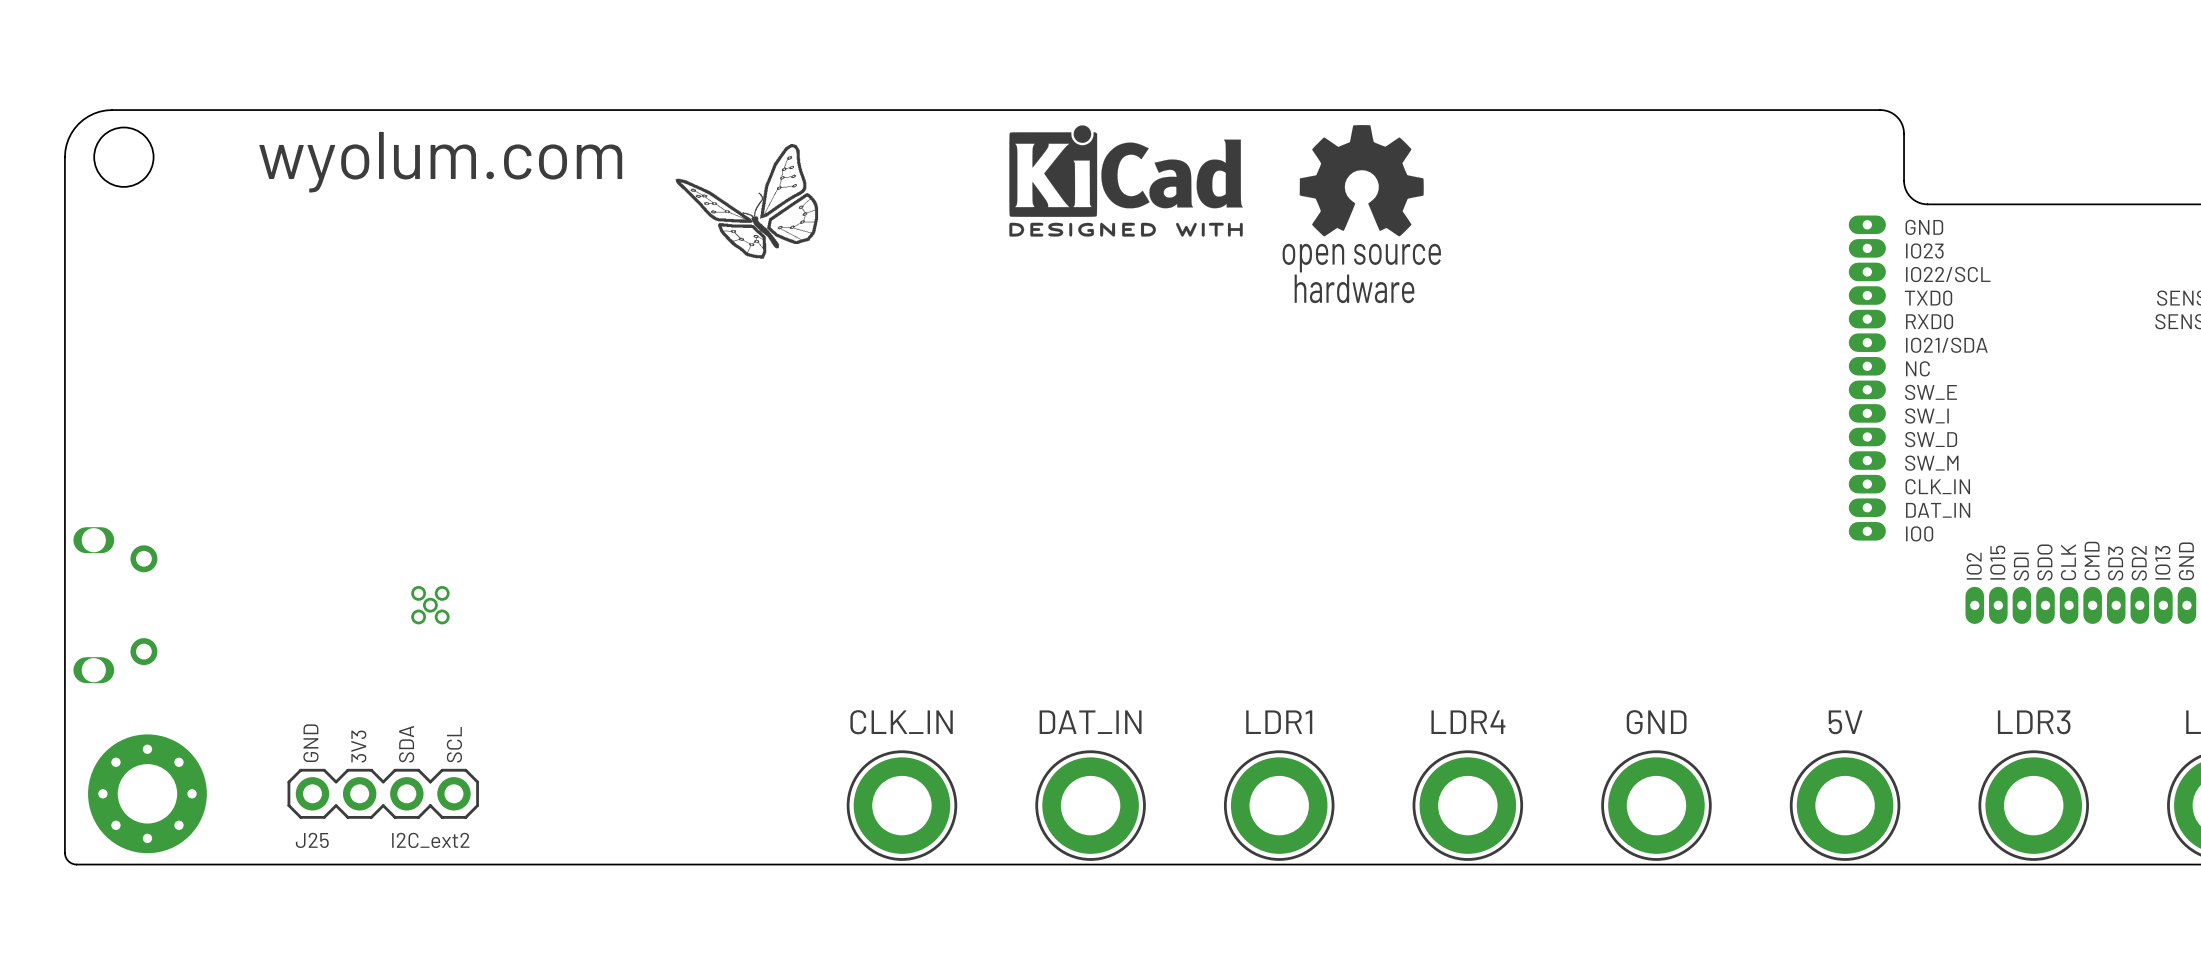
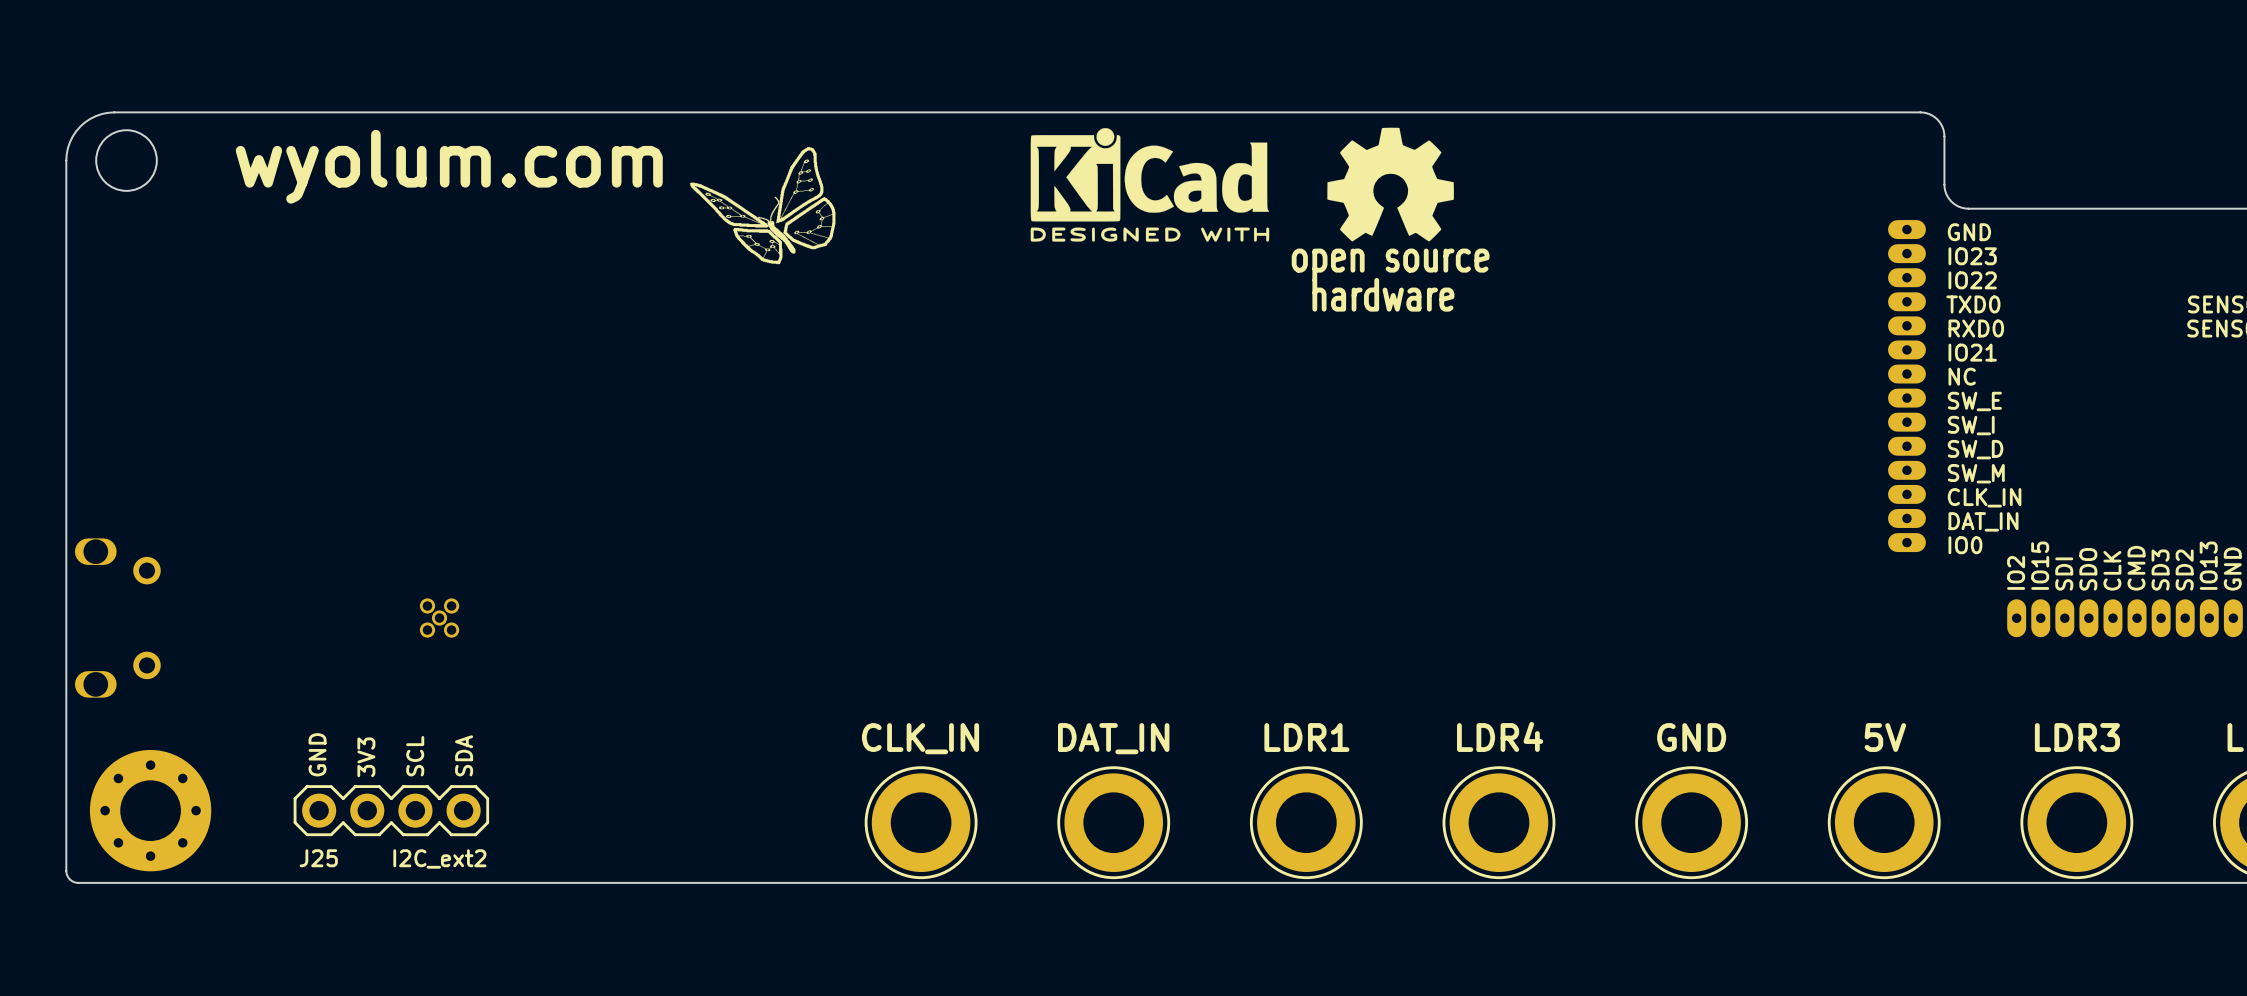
text: IO22/SCL (1948, 274) -> IO22 (1972, 280)
text: IO21/SDA (1946, 345) -> IO21 (1972, 352)
text: SDA (406, 744) -> SCL (415, 756)
text: SCL (454, 744) -> SDA (464, 755)

